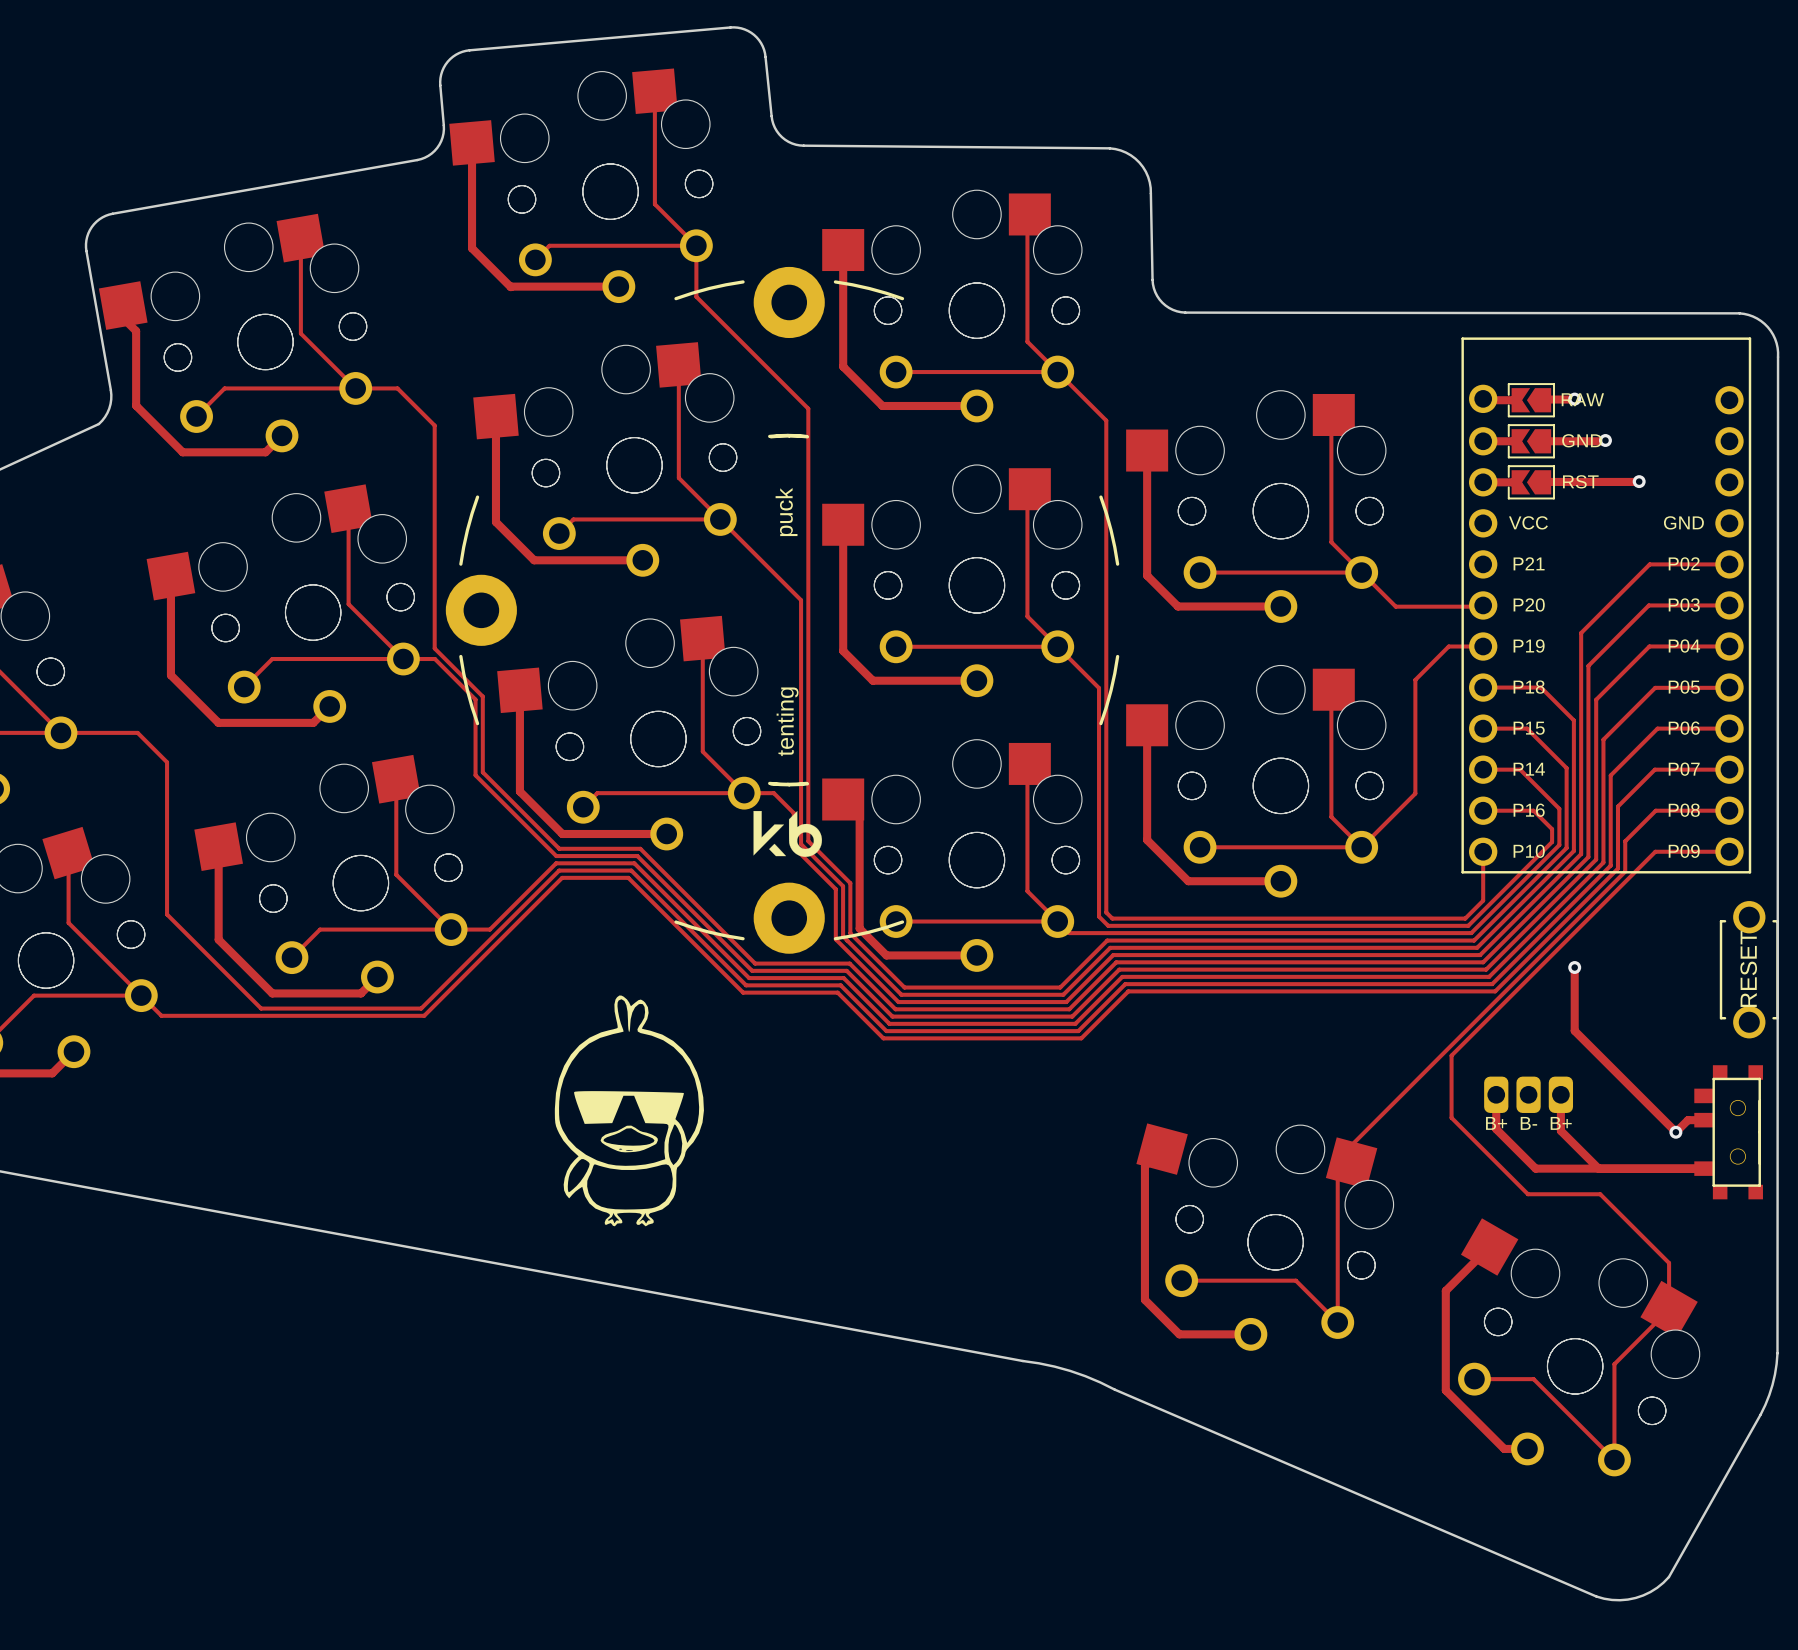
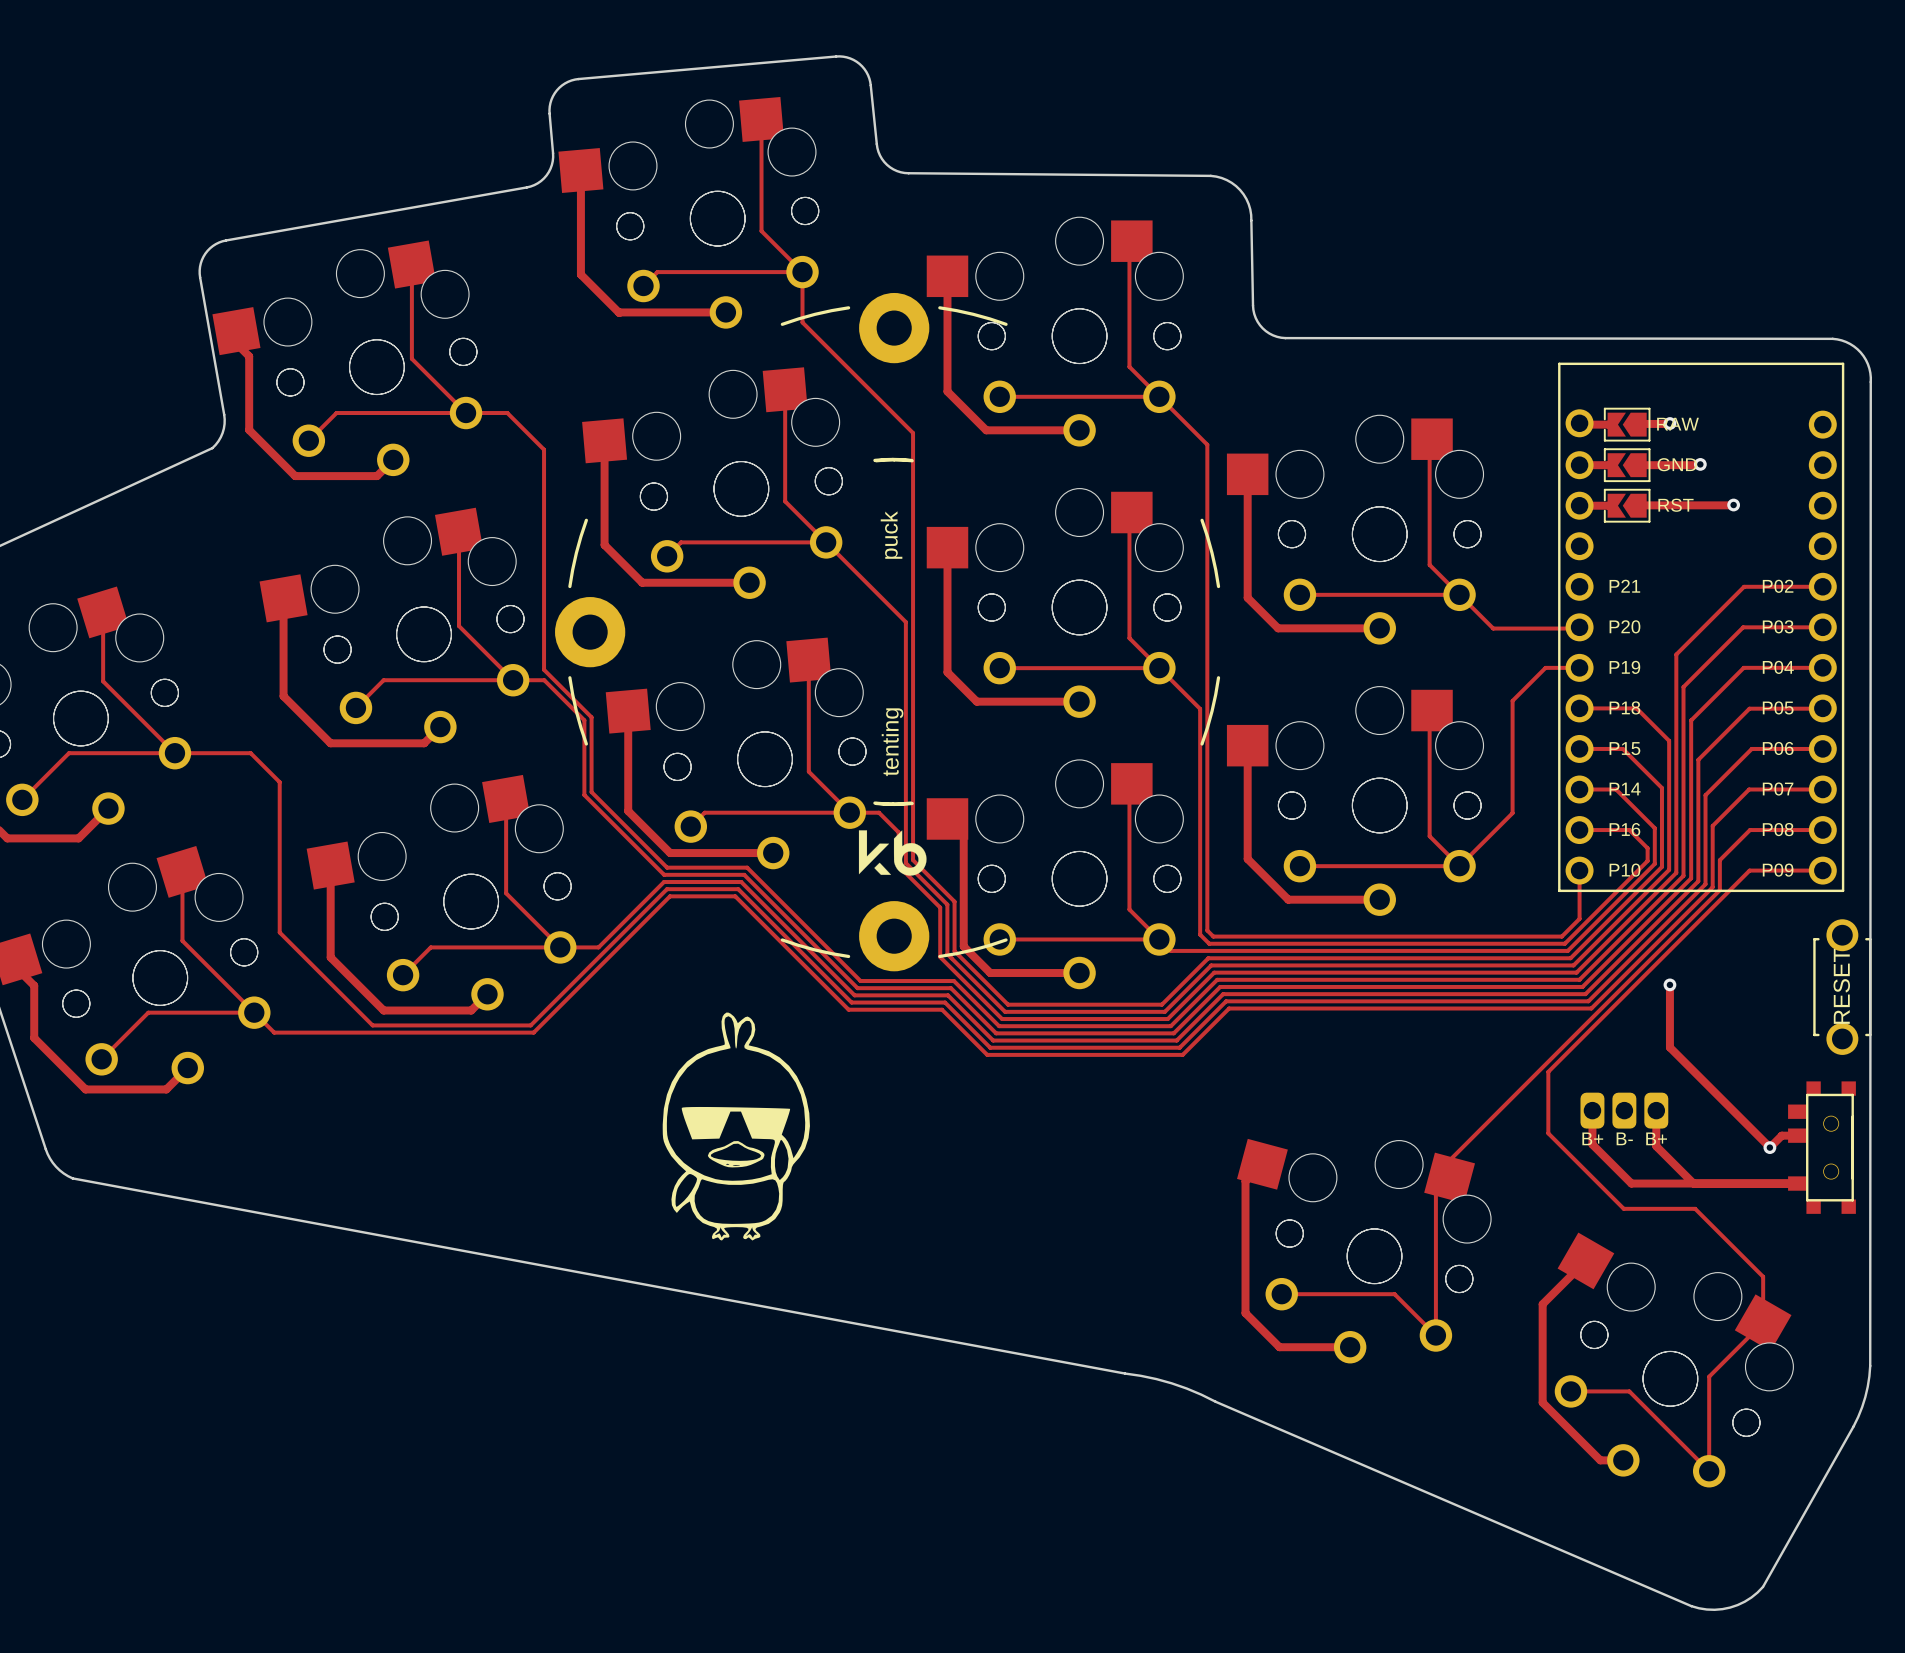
part text: VCC (1528, 522) -> none
part text: GND (1683, 522) -> none

